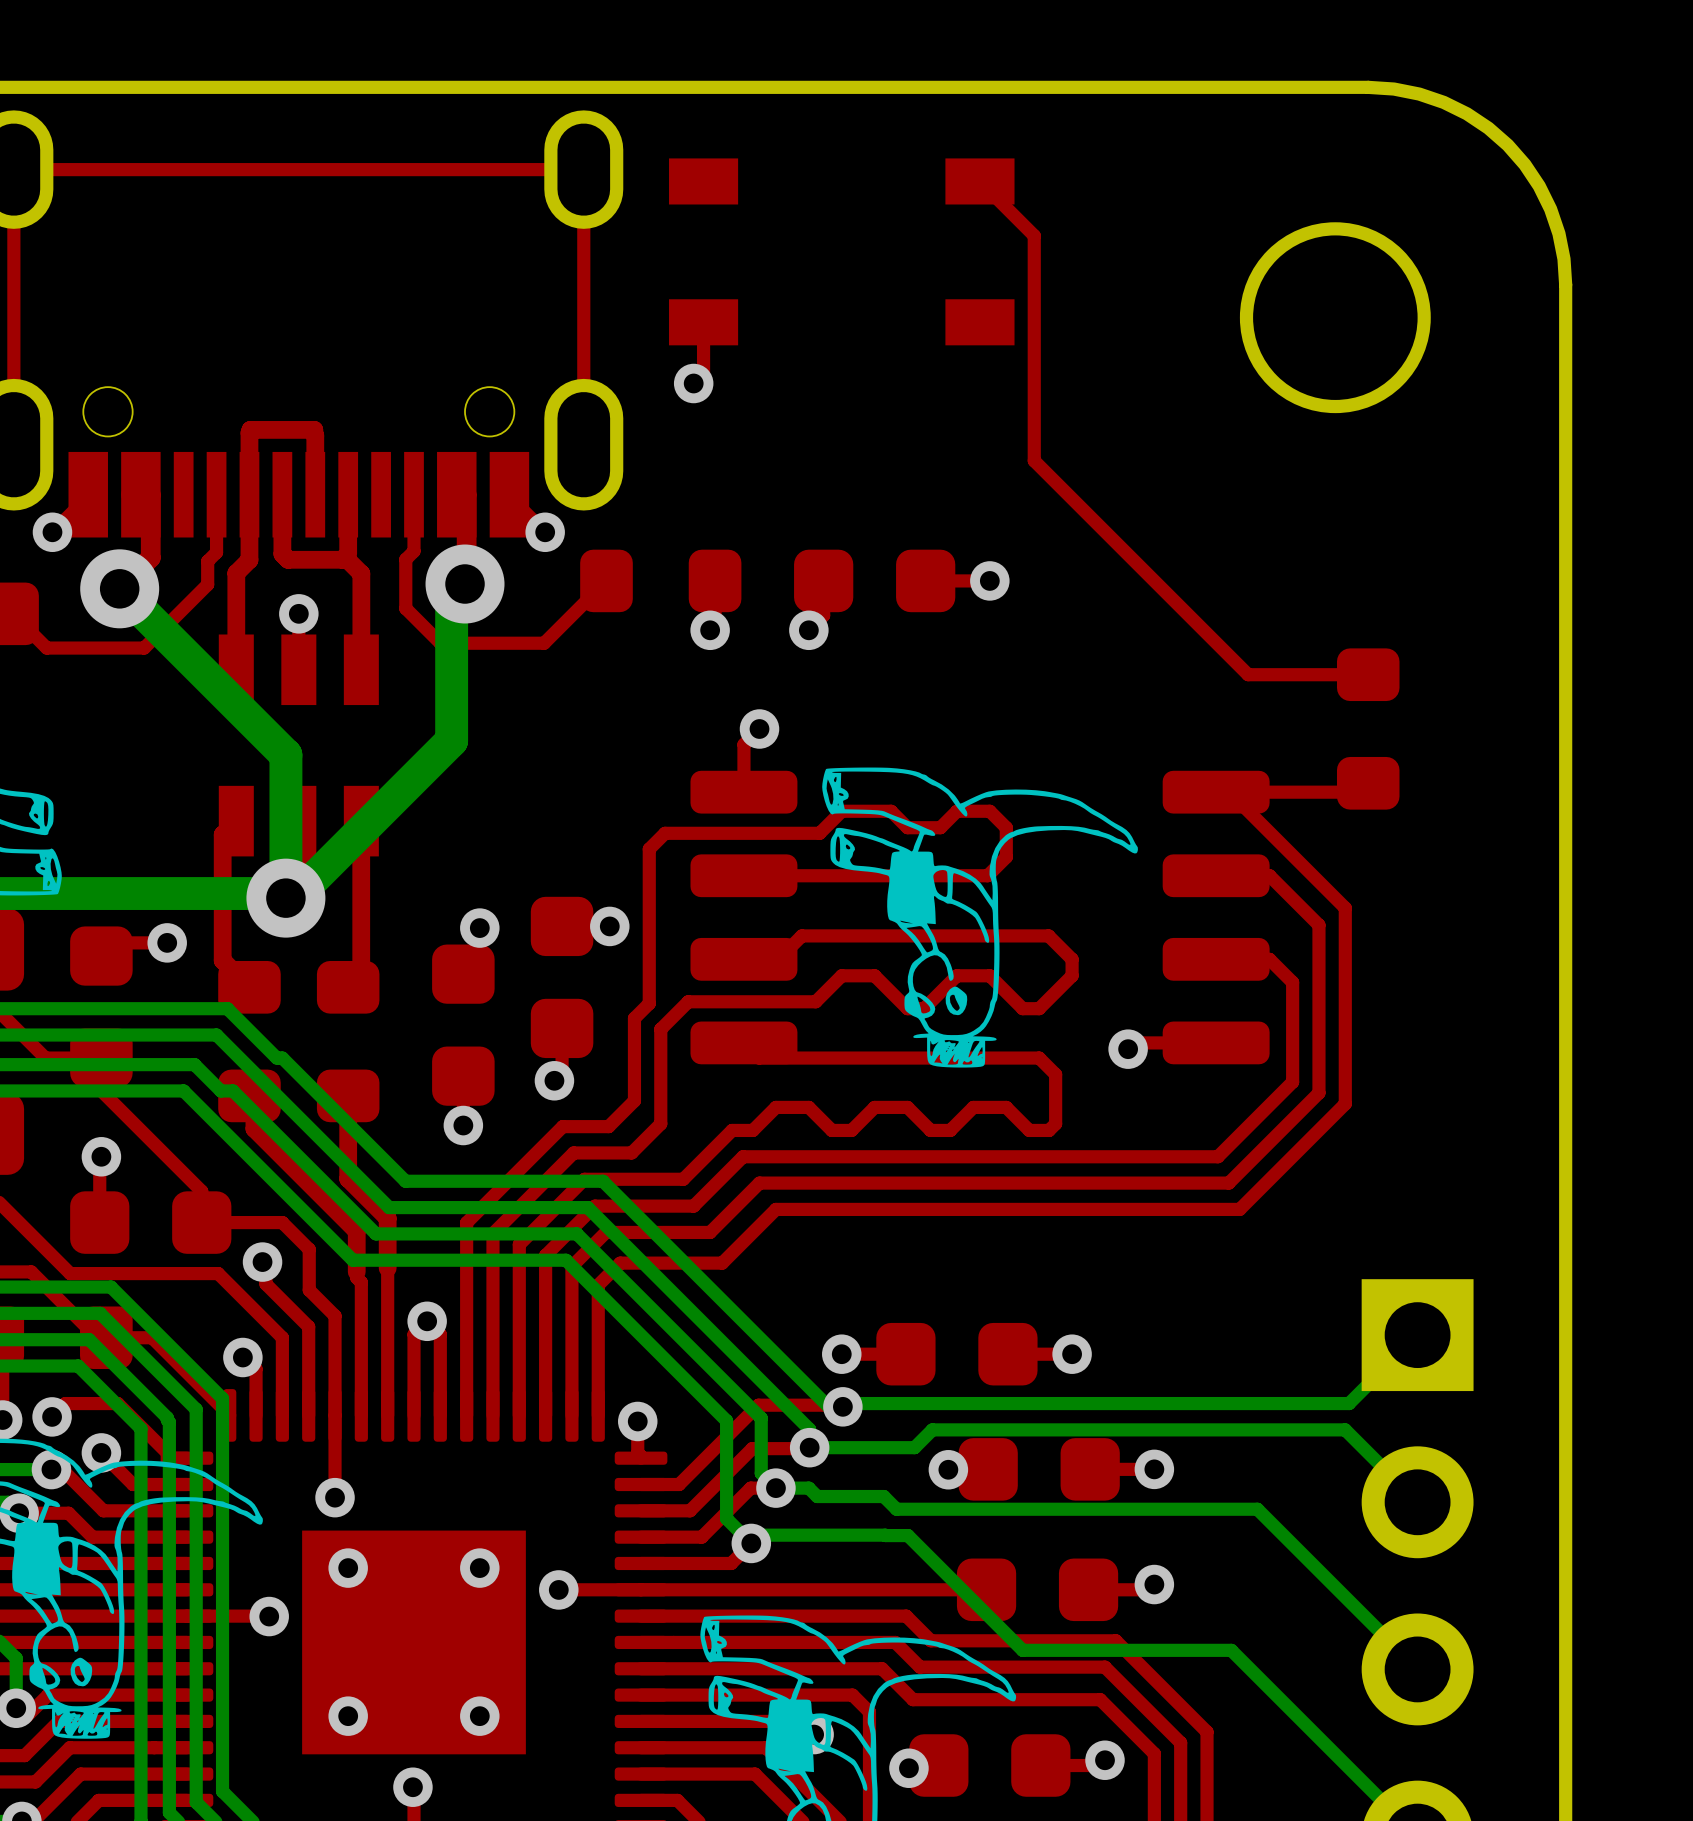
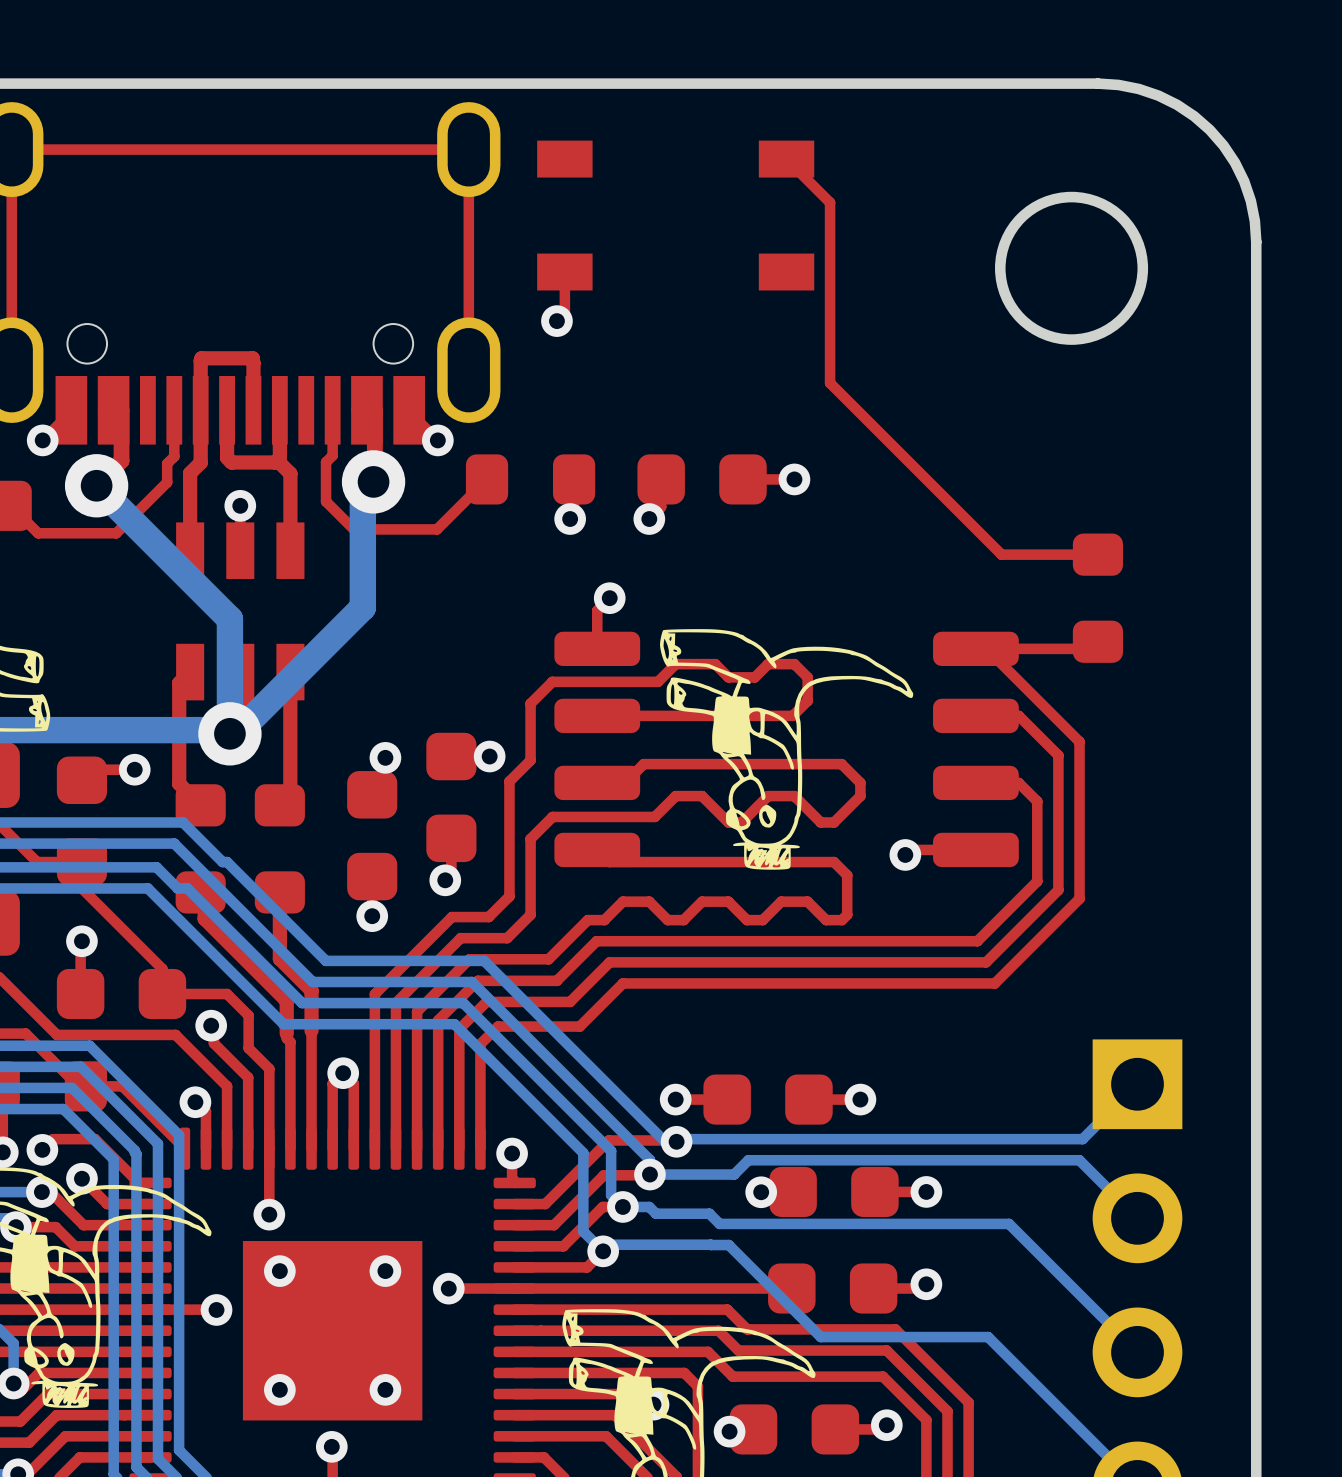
top track: (688, 833) (665, 833) (649, 849) (649, 1003) (634, 1018) -> (552, 681) (530, 703) (530, 760) (509, 781) (509, 830)

